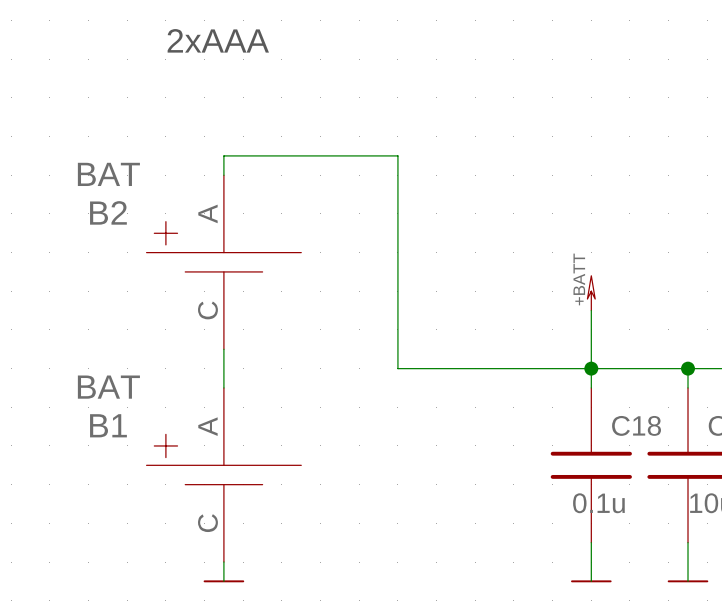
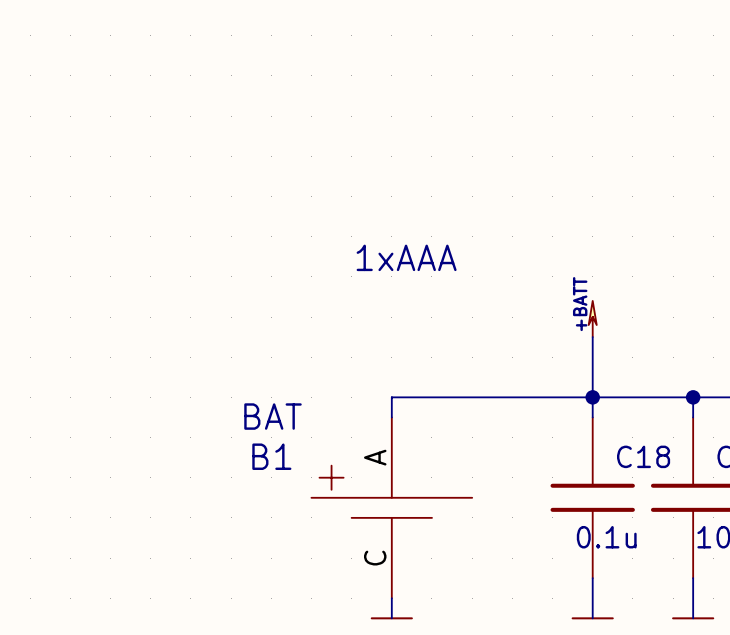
text: 2xAAA (218, 40) -> none
wire: (223, 175) (223, 155) (397, 155) (397, 368) -> (391, 417) (391, 397)
text: none -> 1xAAA (406, 257)
B2: BAT (223, 262) -> none
wire: (223, 349) (223, 387) -> none
B1 position: (223, 474) -> (391, 507)
wire: (223, 562) (223, 581) -> (391, 598) (391, 618)
power symbol position: (223, 581) -> (391, 618)

